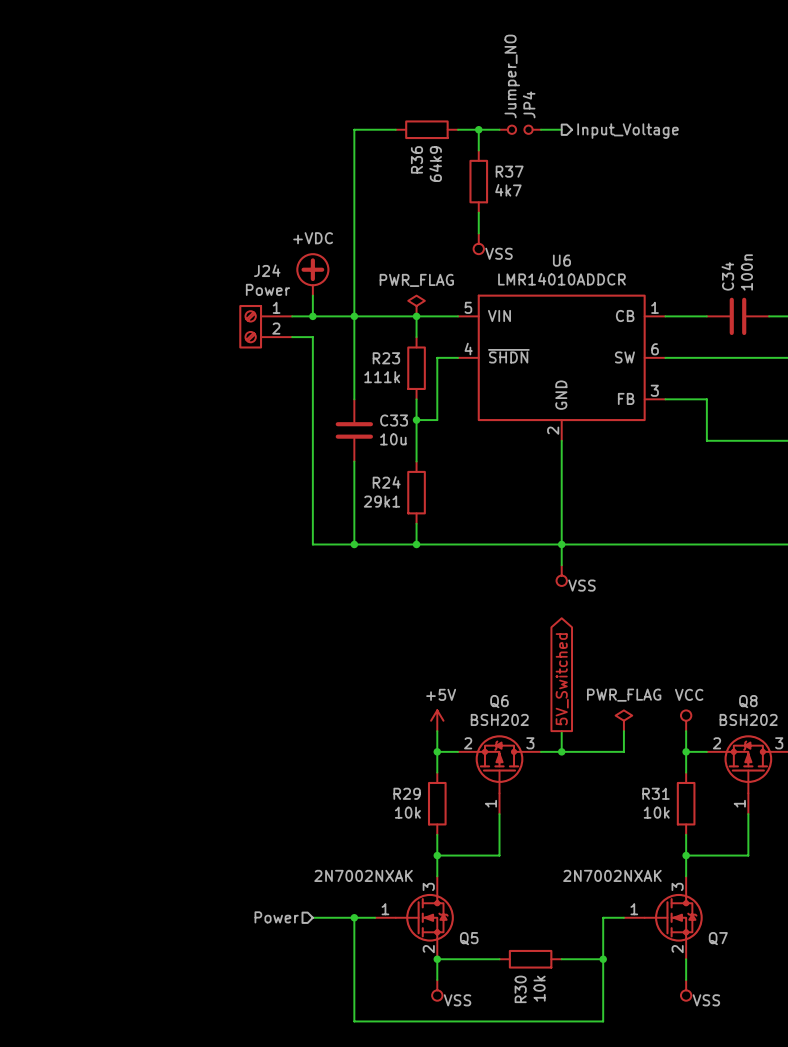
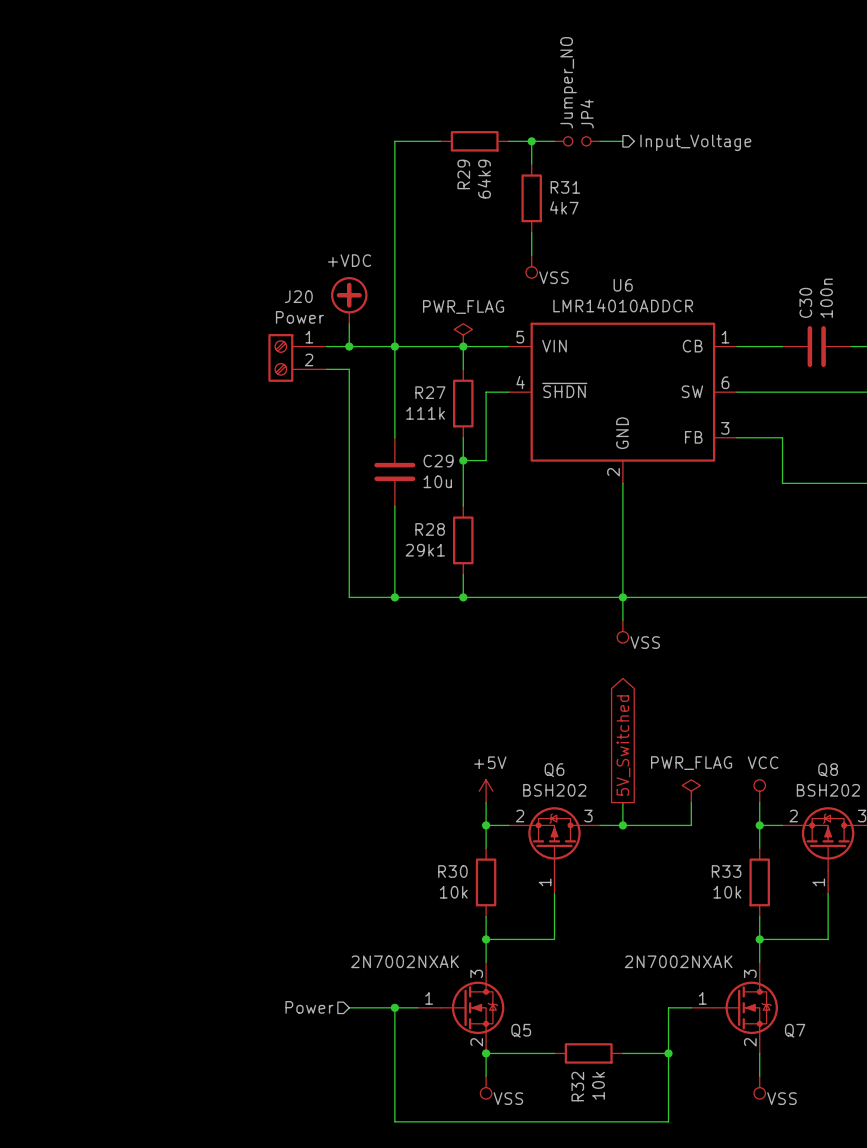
R36 name: R36 (416, 159) -> R29 (463, 174)
R37 name: R37 (509, 171) -> R31 (565, 187)
J24 name: J24 (267, 270) -> J20 (298, 296)
C34 name: C34 (727, 276) -> C30 (805, 302)
R23 name: R23 (386, 358) -> R27 (430, 392)
C33 name: C33 (394, 420) -> C29 (438, 461)
R24 name: R24 (386, 482) -> R28 (430, 529)
R29 name: R29 (407, 793) -> R30 (452, 871)
R31 name: R31 (655, 793) -> R33 (726, 871)
R30 name: R30 (520, 989) -> R32 (577, 1086)

